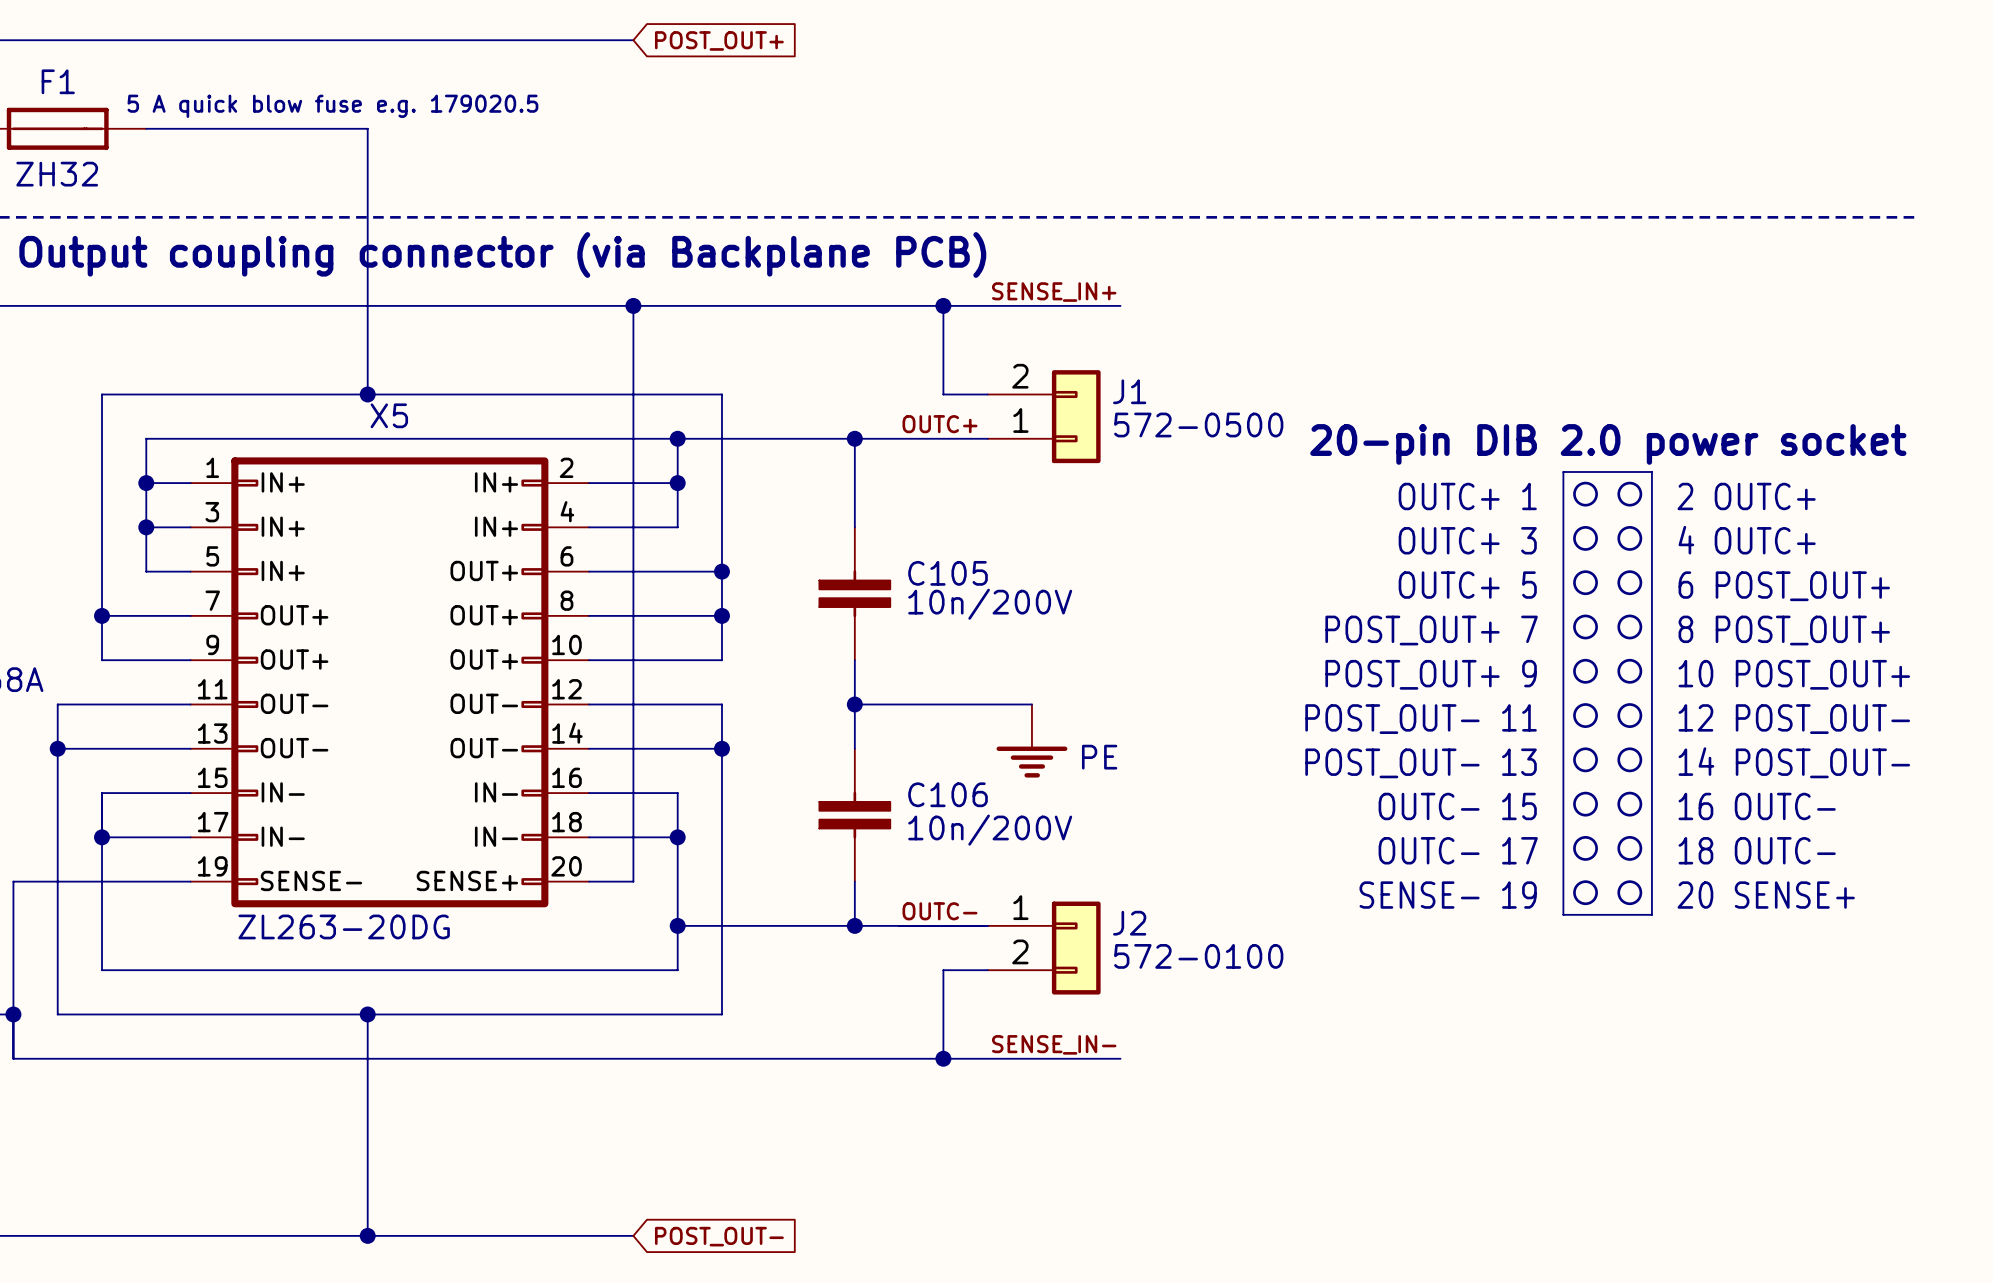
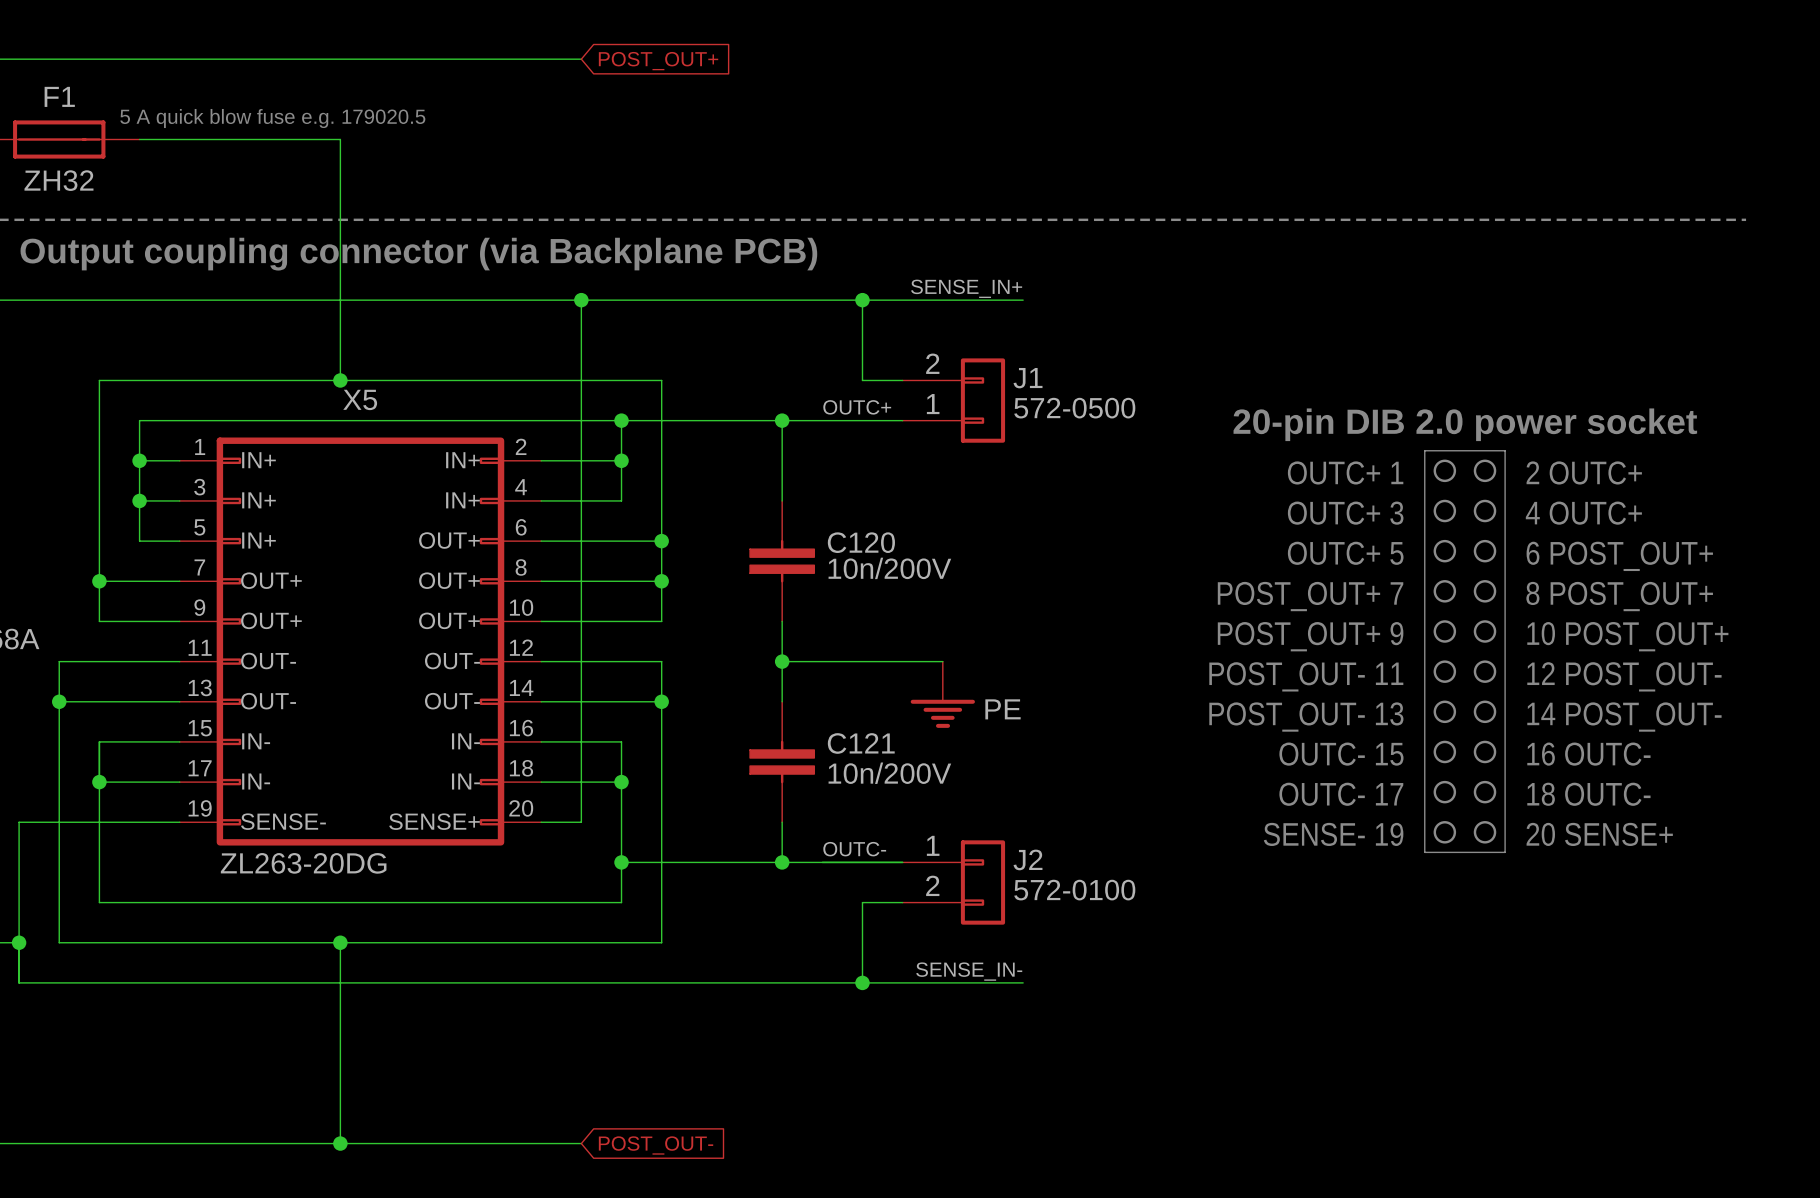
C105 name: C105 (948, 573) -> C120 (861, 542)
C106 name: C106 (948, 794) -> C121 (861, 743)

